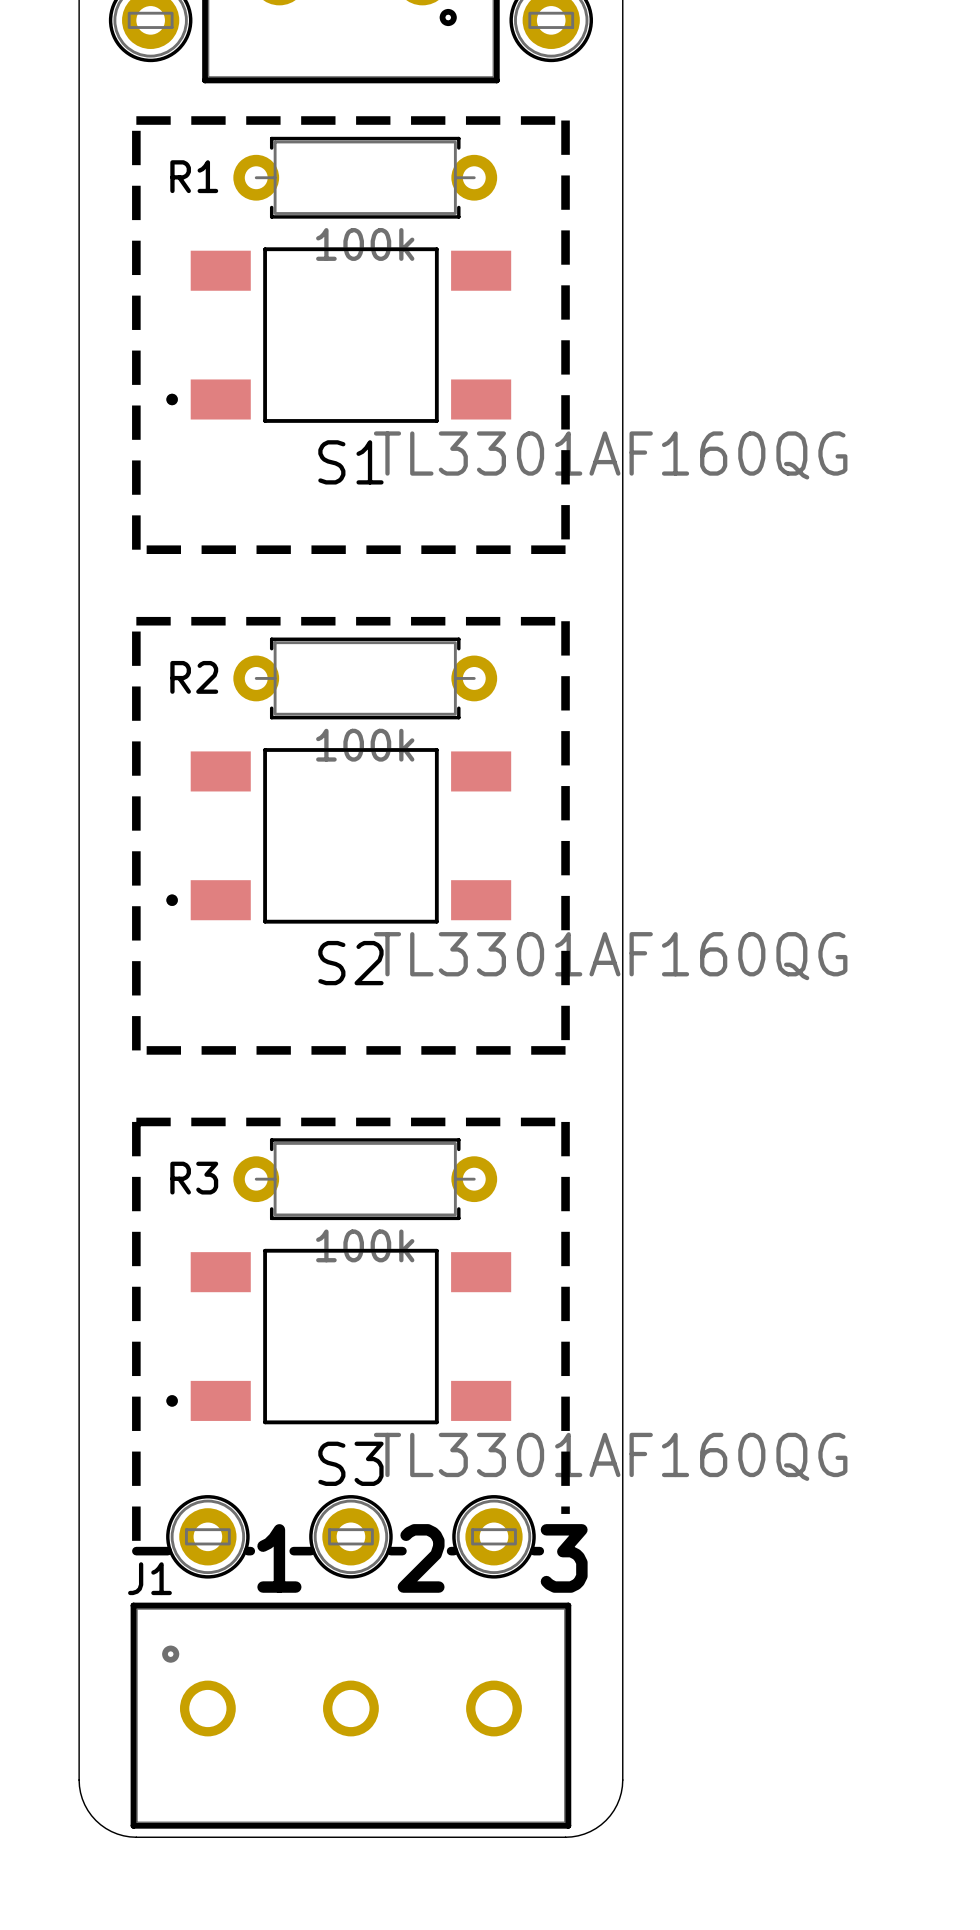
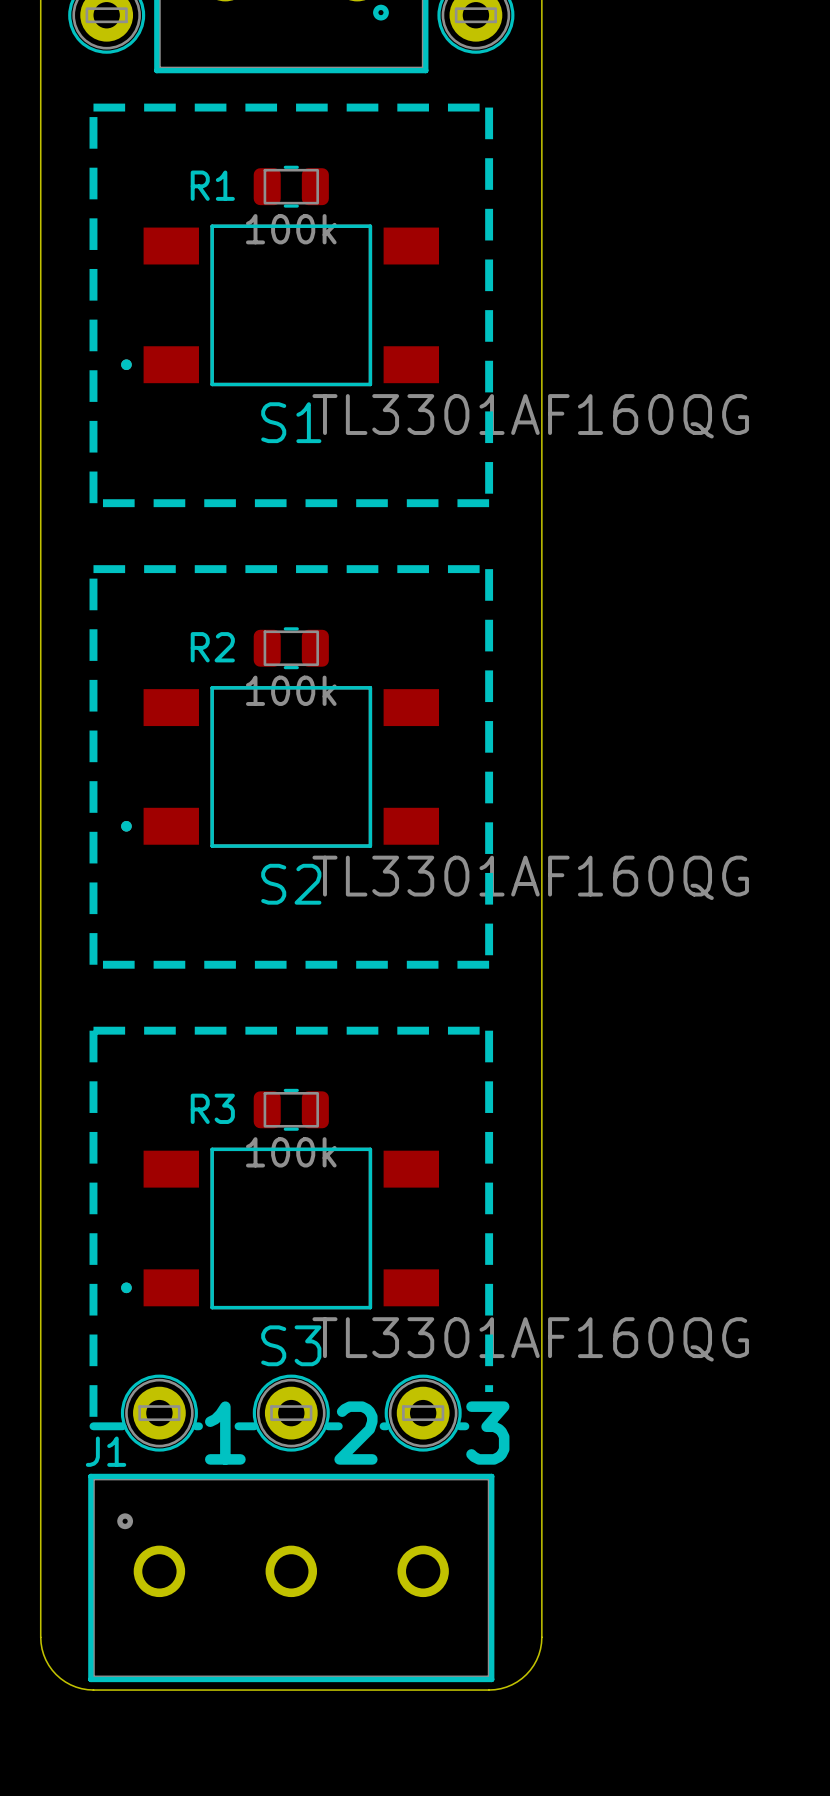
R1 footprint: [233, 136, 498, 219] -> [253, 165, 329, 208]
R1 name position: R1 (194, 176) -> R1 (212, 185)
R2 footprint: [233, 637, 498, 720] -> [253, 627, 329, 670]
R2 name position: R2 (194, 677) -> R2 (212, 647)
R3 footprint: [233, 1138, 498, 1221] -> [253, 1088, 329, 1131]
R3 name position: R3 (194, 1178) -> R3 (212, 1108)

